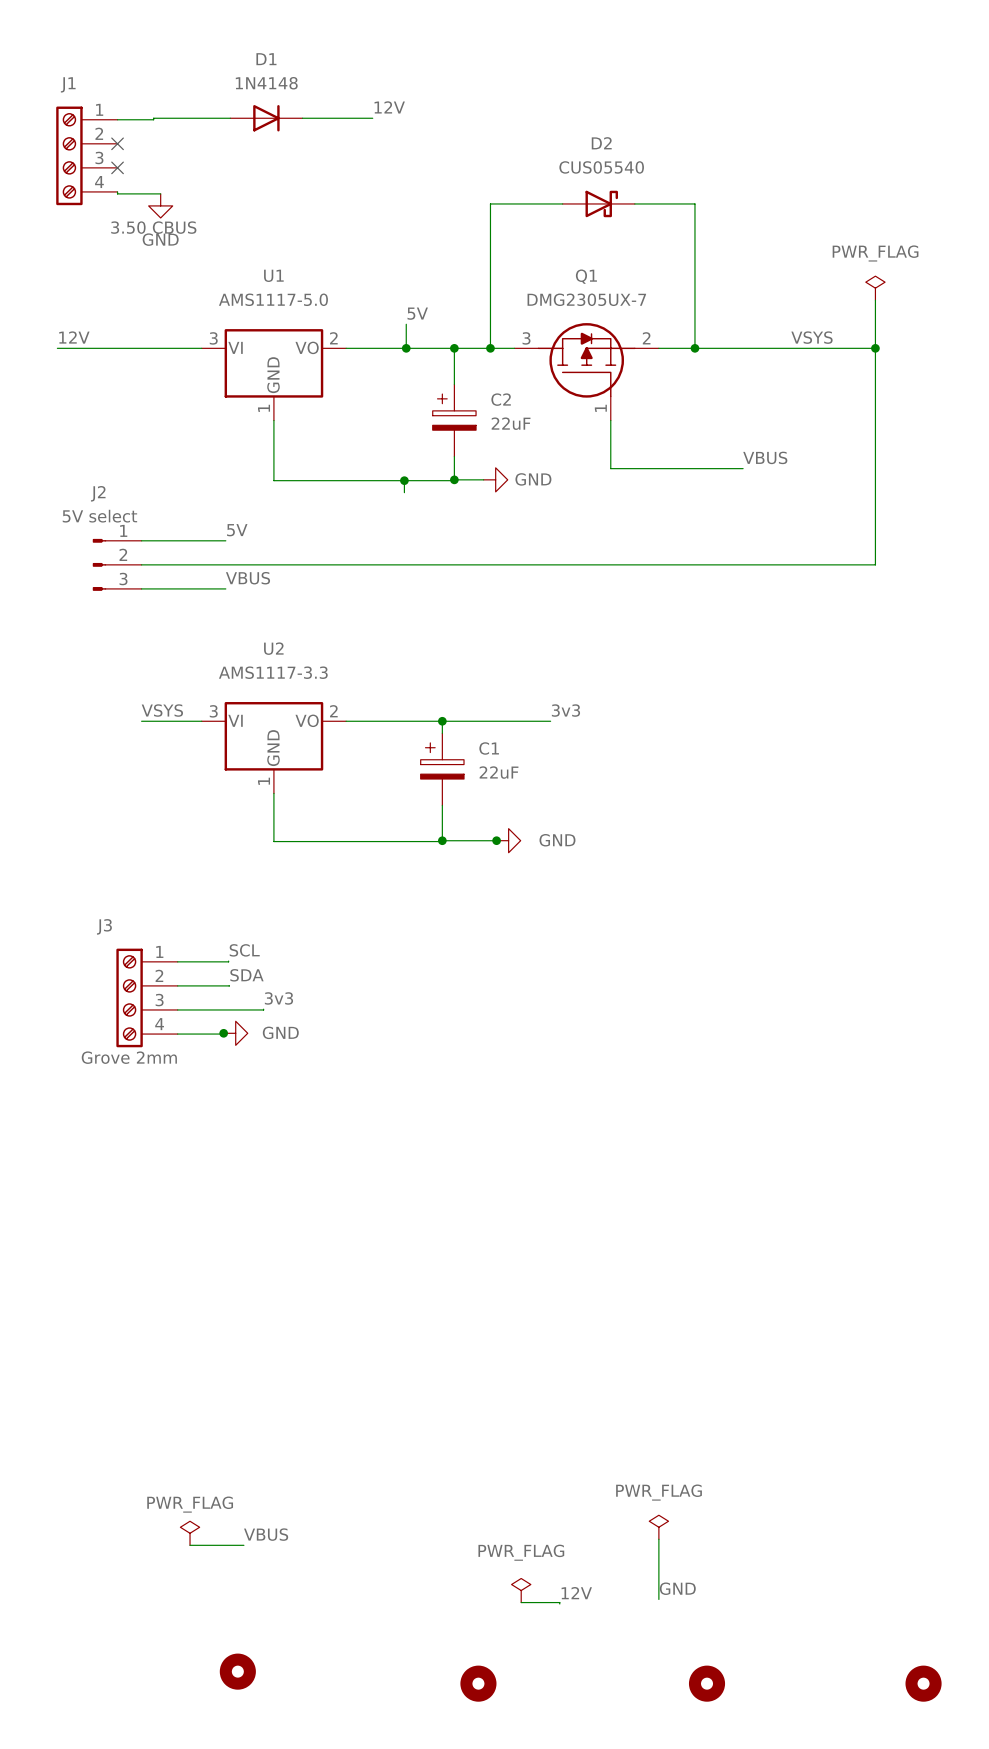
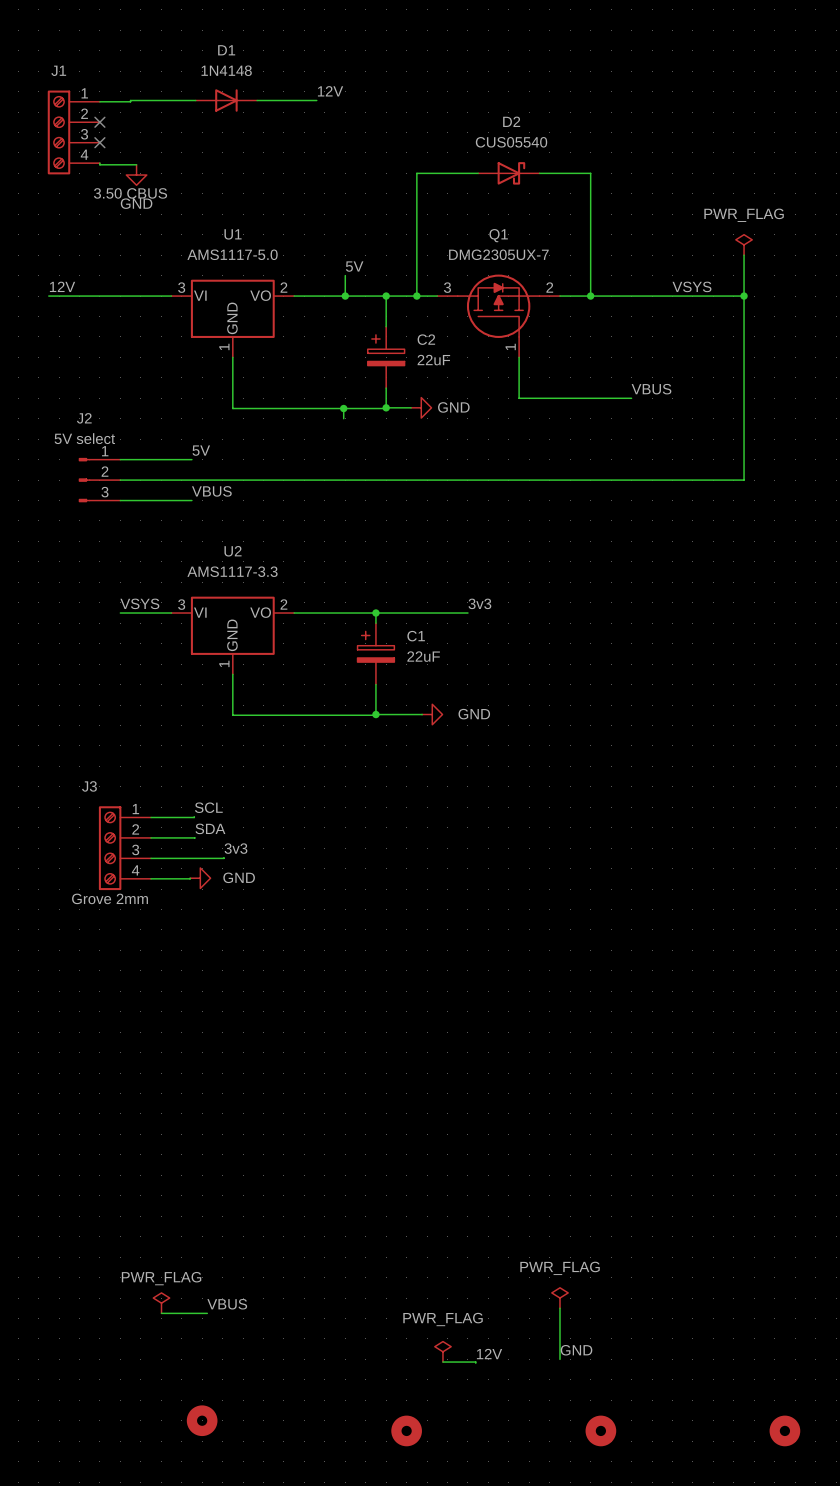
junction: (496, 840) -> none
junction: (223, 1033) -> none

